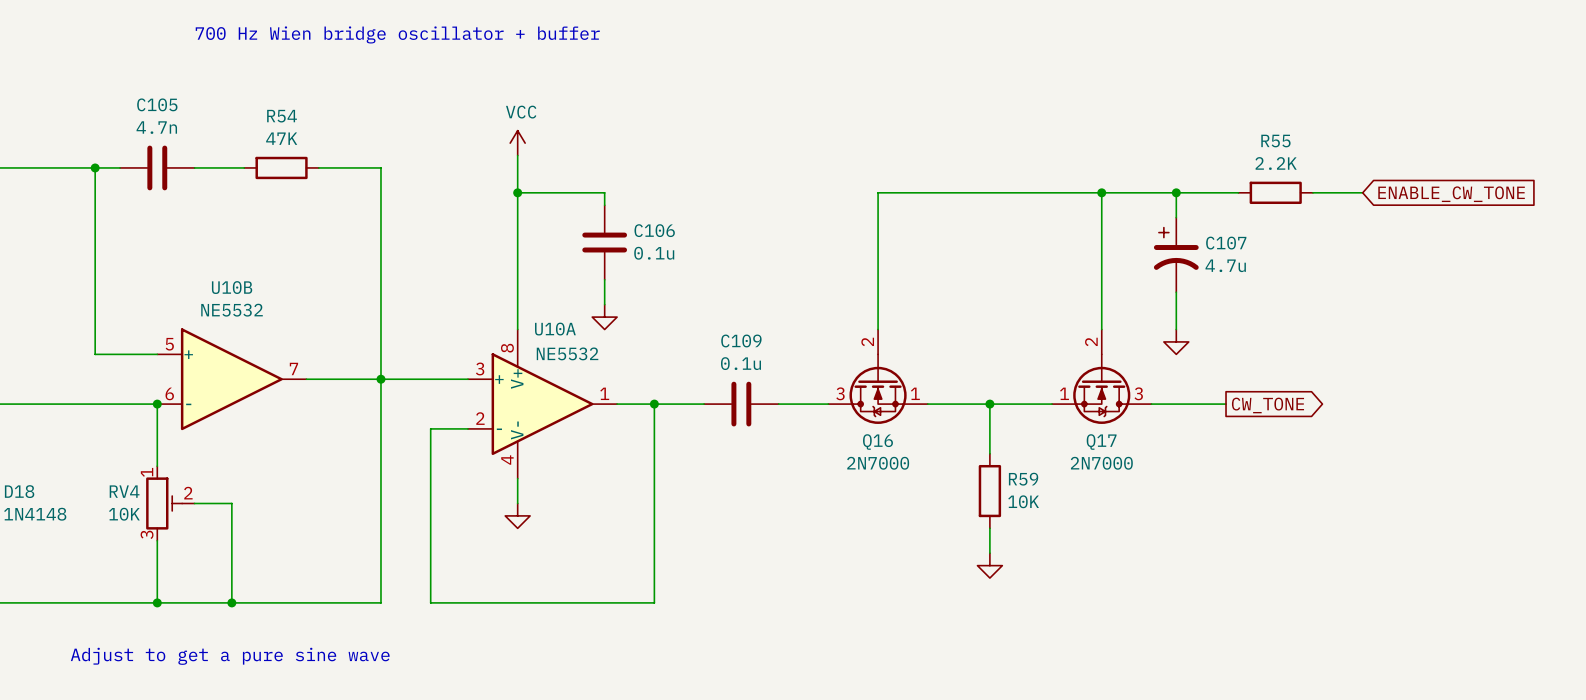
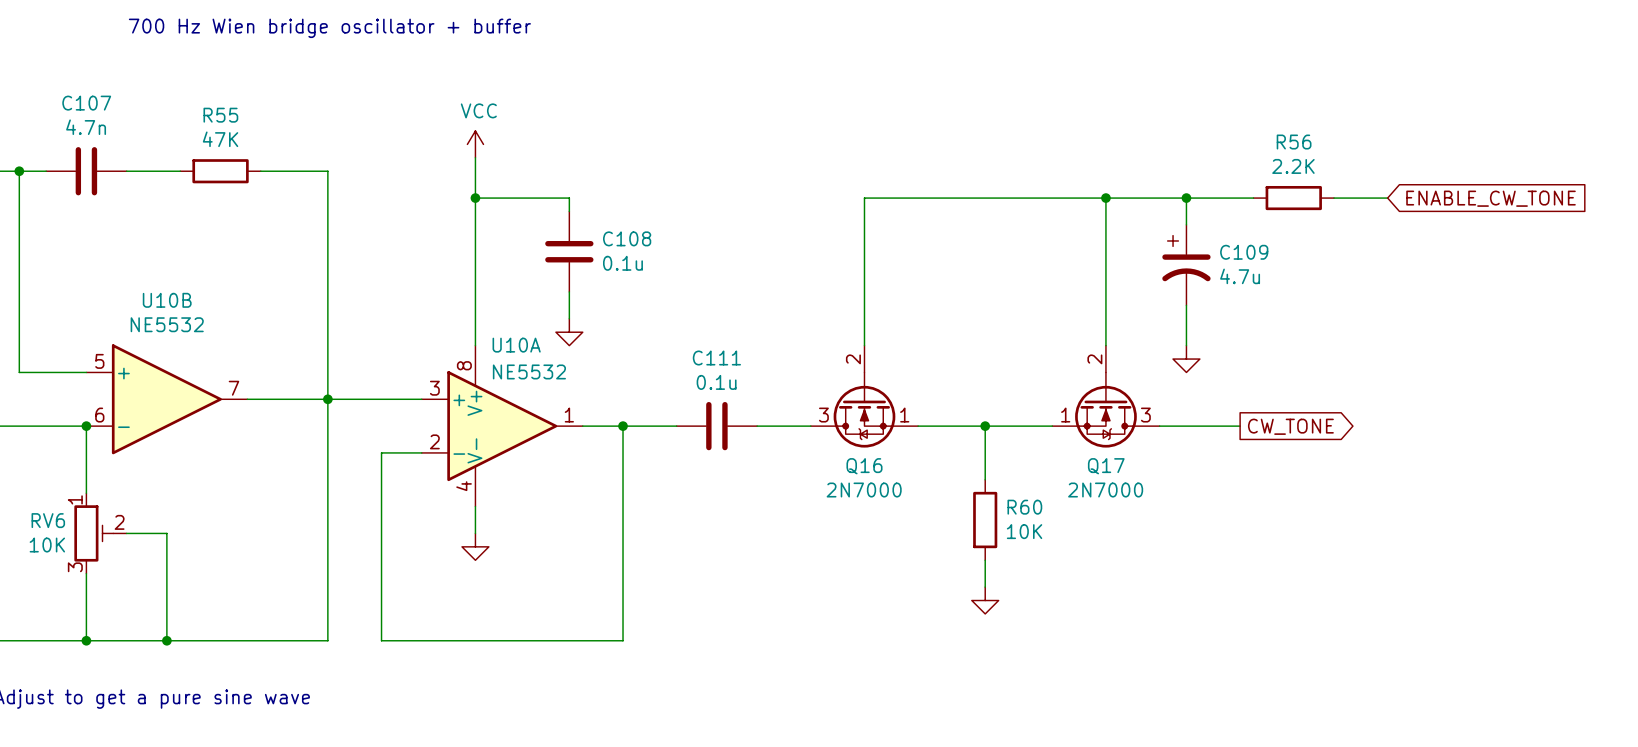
C105 name: C105 (157, 104) -> C107 (86, 103)
R54 name: R54 (282, 116) -> R55 (220, 115)
R55 name: R55 (1275, 141) -> R56 (1294, 142)
C106 name: C106 (654, 230) -> C108 (627, 238)
C107 name: C107 (1226, 243) -> C109 (1244, 252)
C109 name: C109 (741, 340) -> C111 (716, 358)
R59 name: R59 (1023, 479) -> R60 (1024, 507)
RV4 name: RV4 (124, 491) -> RV6 (48, 520)

